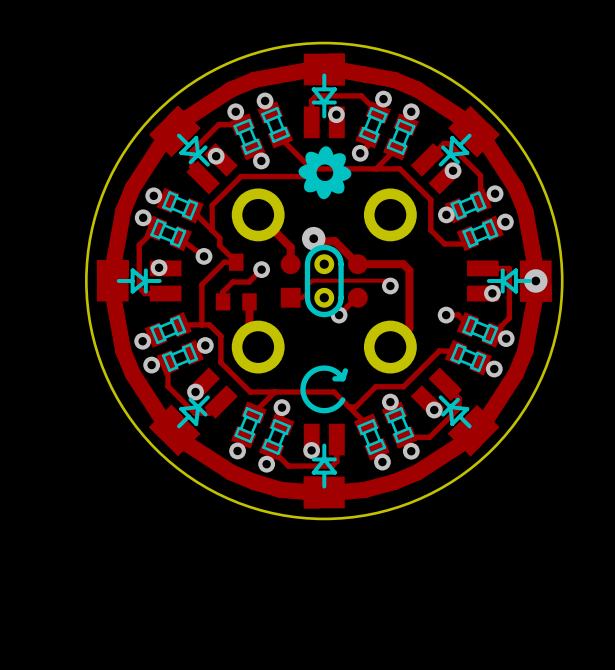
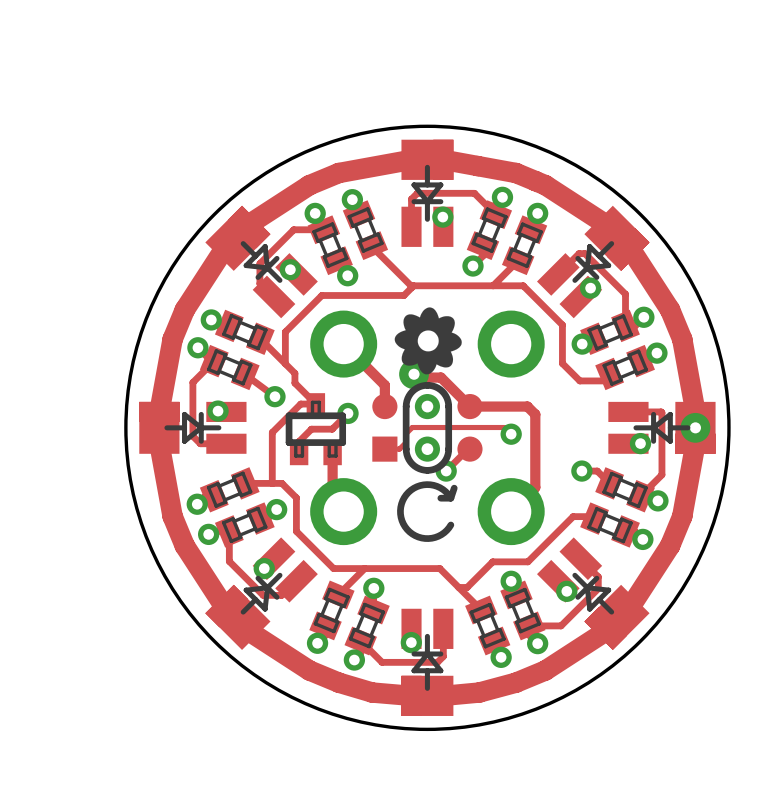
drawing position: (324, 172) -> (428, 340)
part footprint: [215, 253, 257, 311] -> [285, 393, 347, 466]
line: (345, 370) (342, 378) (334, 378) -> (454, 488) (450, 498) (440, 498)
line: (340, 375) (329, 368) (316, 369) (306, 378) (303, 391) (308, 403) (319, 410) (332, 408) (342, 399) -> (448, 494) (433, 485) (416, 486) (404, 497) (400, 514) (407, 529) (421, 538) (438, 536) (450, 525)

